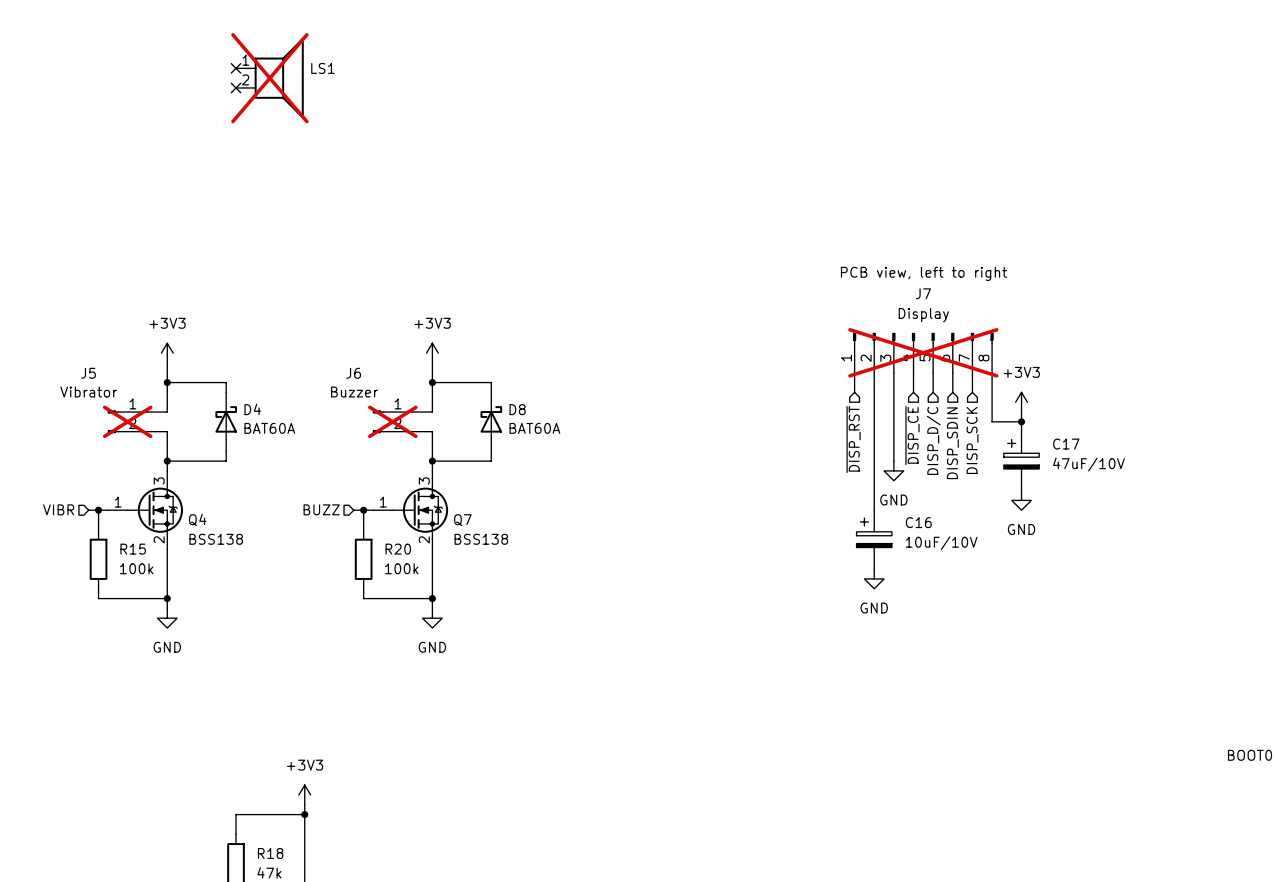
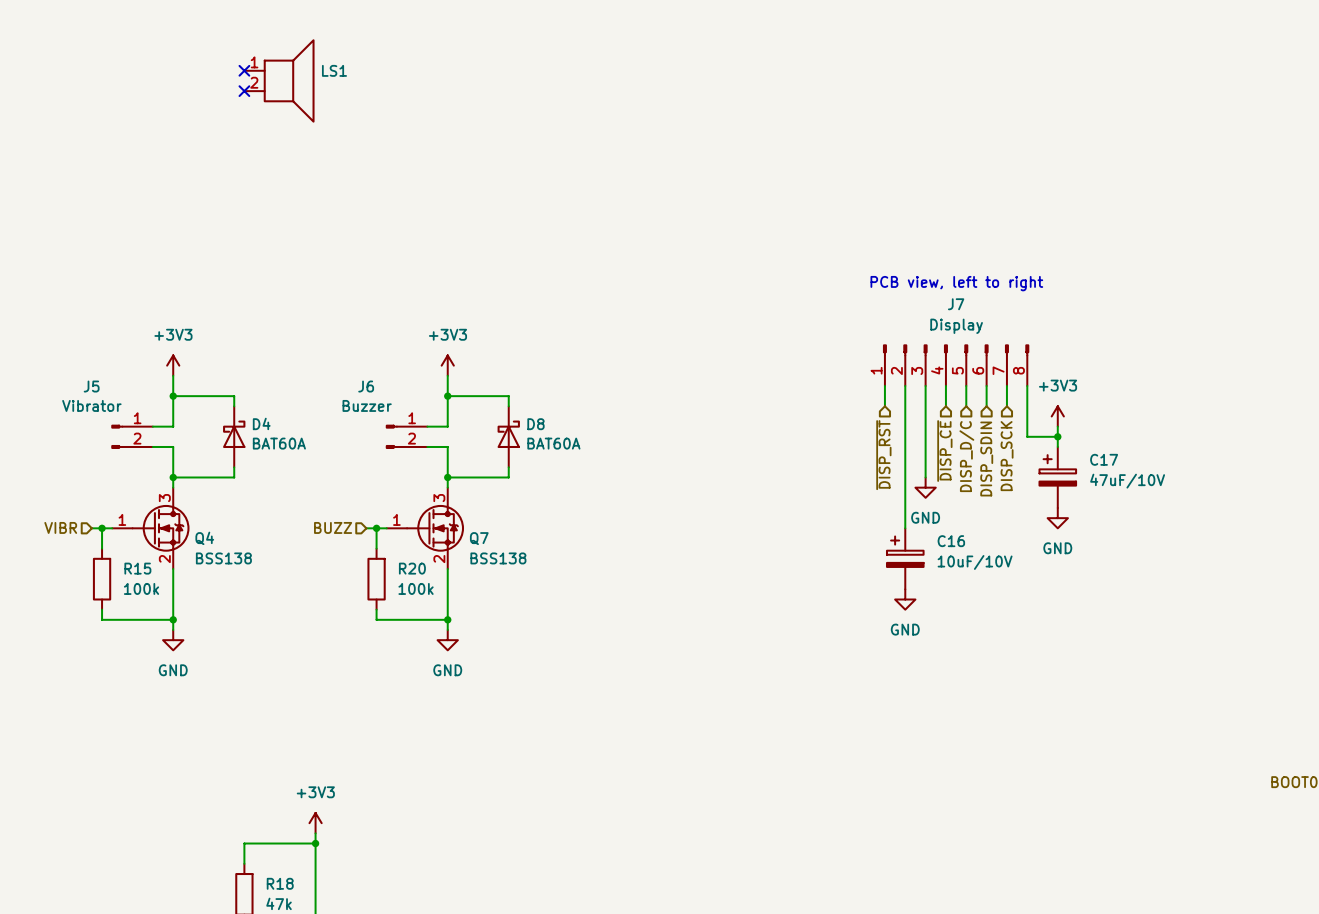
LS1 do-not-place cross: (269, 78) -> none
J7 do-not-place cross: (923, 352) -> none
J5 do-not-place cross: (127, 421) -> none
J6 do-not-place cross: (392, 421) -> none

